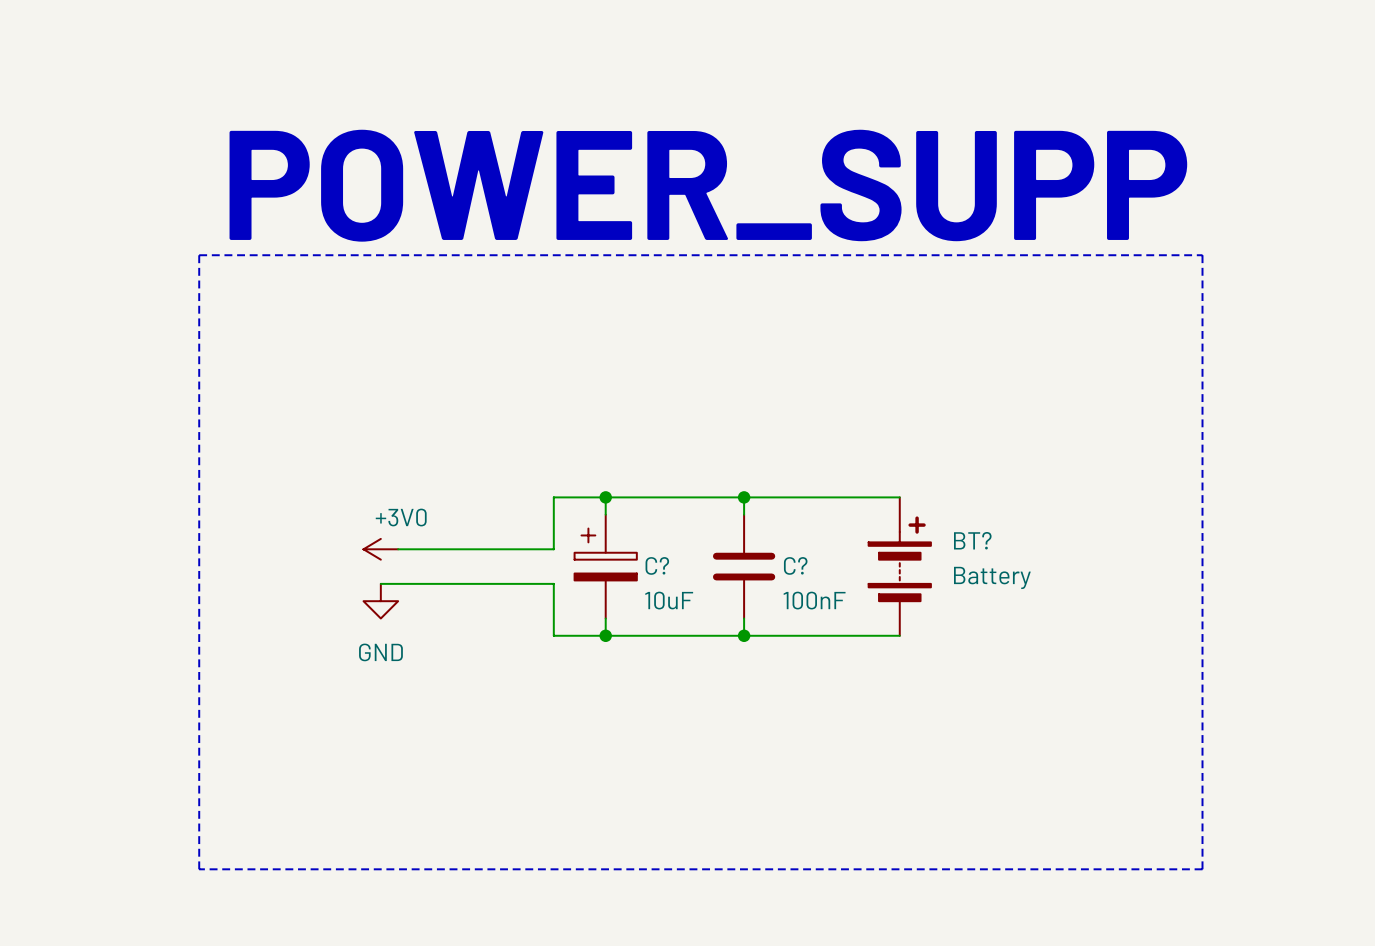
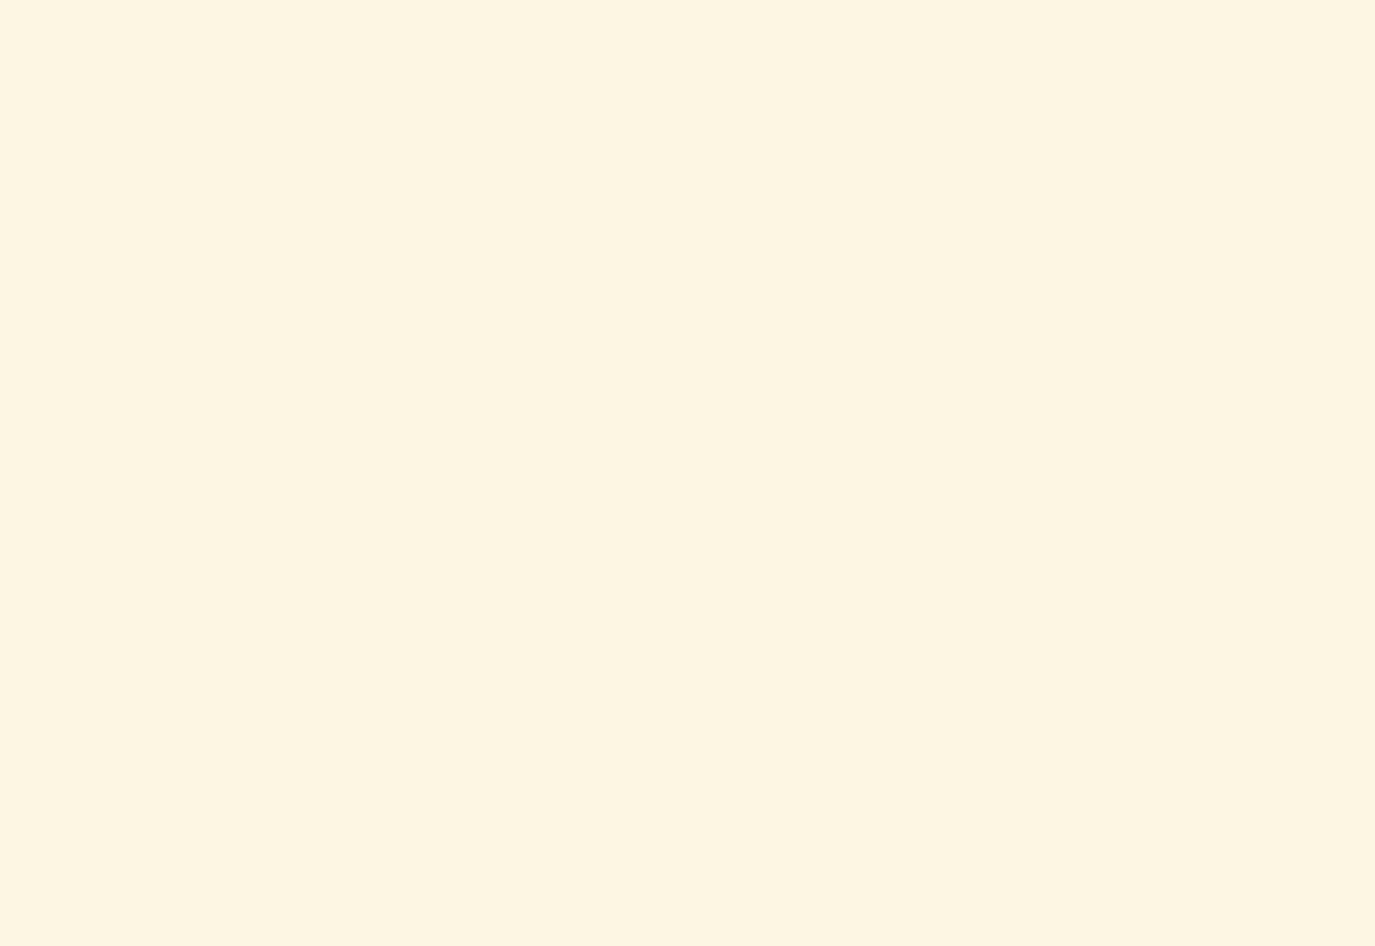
text: POWER_SUPP (708, 185) -> none
line: (199, 255) (1202, 255) (1202, 869) (199, 869) (199, 255) -> none
wire: (605, 497) (605, 514) -> none
junction: (605, 497) -> none
wire: (744, 497) (744, 514) -> none
junction: (744, 497) -> none
wire: (899, 497) (553, 497) (553, 549) (398, 549) -> none
power symbol: +3V0 (380, 549) -> none
C?: 10uF (605, 566) -> none
C?: 100nF (744, 566) -> none
BT?: Battery (899, 566) -> none
wire: (380, 583) (553, 583) (553, 635) (899, 635) -> none
power symbol: GND (380, 601) -> none
wire: (605, 618) (605, 635) -> none
wire: (744, 618) (744, 635) -> none
junction: (605, 635) -> none
junction: (744, 635) -> none

